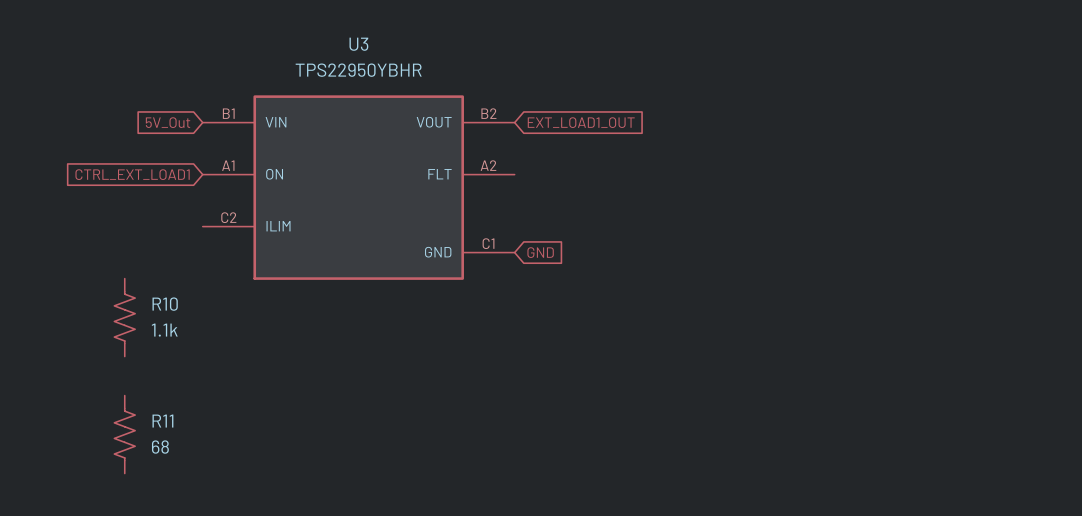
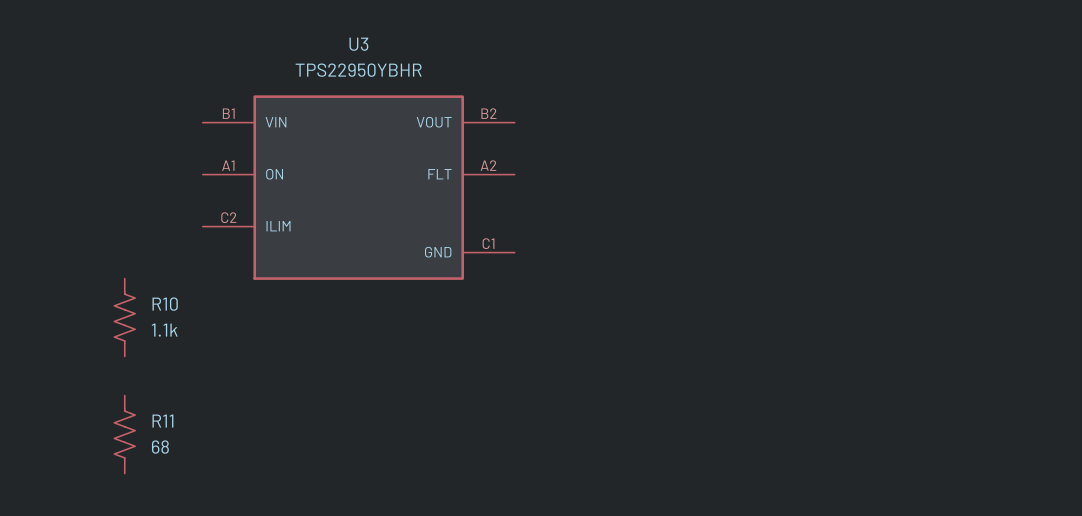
global label: 5V_Out (168, 122) -> none
global label: EXT_LOAD1_OUT (581, 122) -> none
global label: CTRL_EXT_LOAD1 (132, 174) -> none
global label: GND (540, 252) -> none

